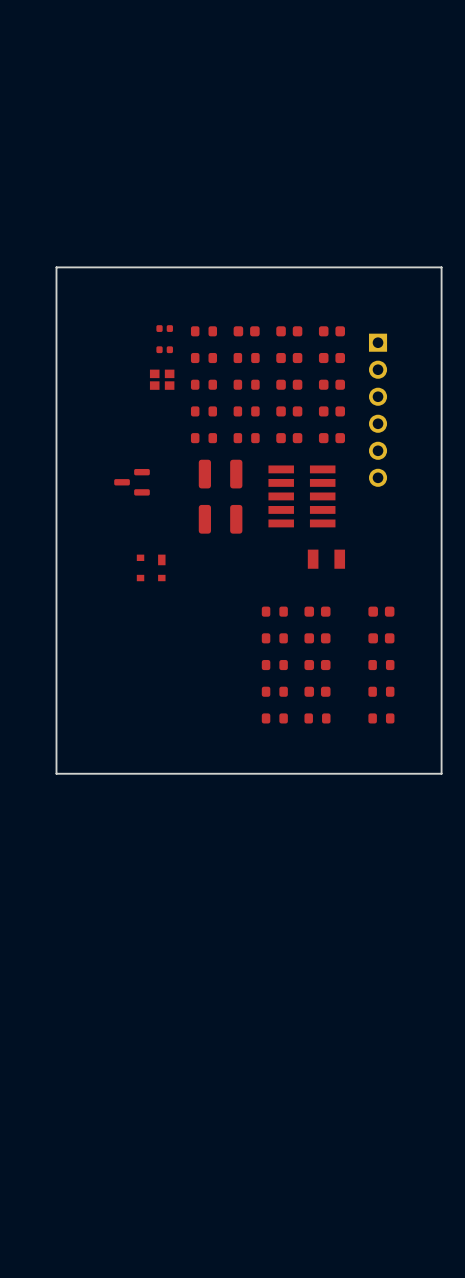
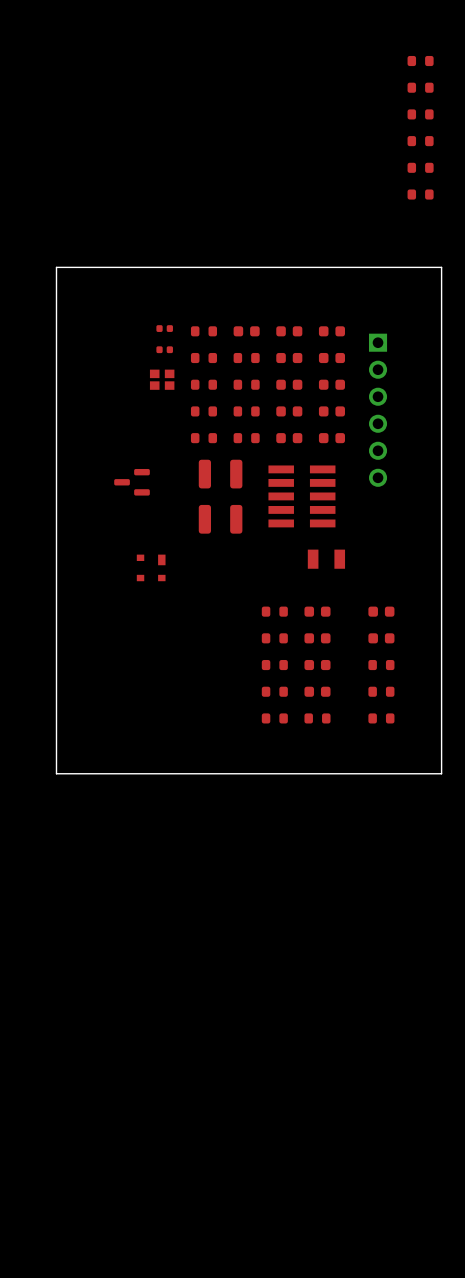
part: none -> (420, 61)
part: none -> (420, 87)
part: none -> (420, 114)
part: none -> (420, 141)
part: none -> (420, 167)
part: none -> (420, 194)

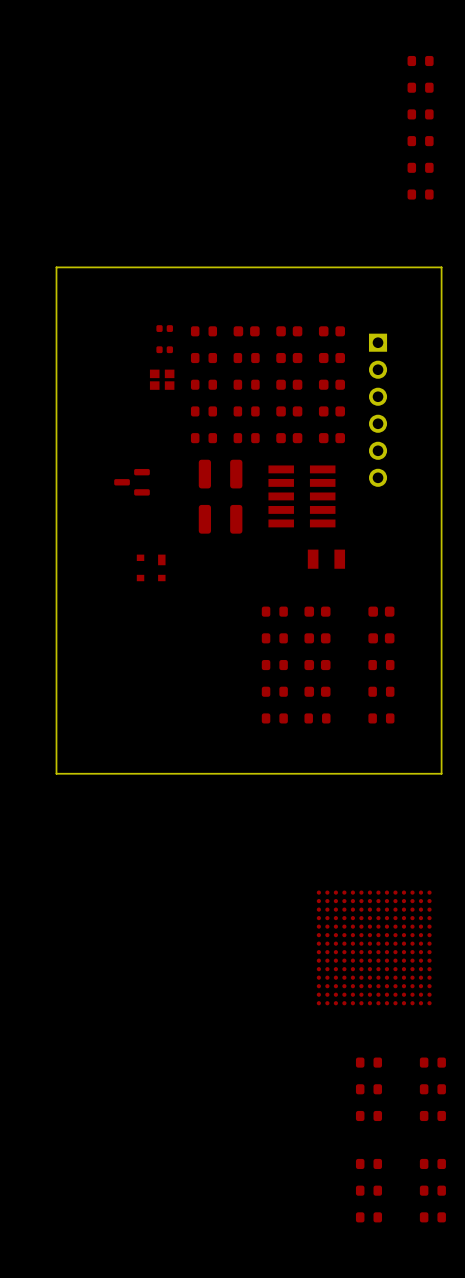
part: none -> (374, 947)
part: none -> (368, 1062)
part: none -> (432, 1062)
part: none -> (368, 1089)
part: none -> (432, 1089)
part: none -> (368, 1115)
part: none -> (432, 1115)
part: none -> (368, 1163)
part: none -> (432, 1163)
part: none -> (368, 1190)
part: none -> (432, 1190)
part: none -> (368, 1217)
part: none -> (432, 1217)

